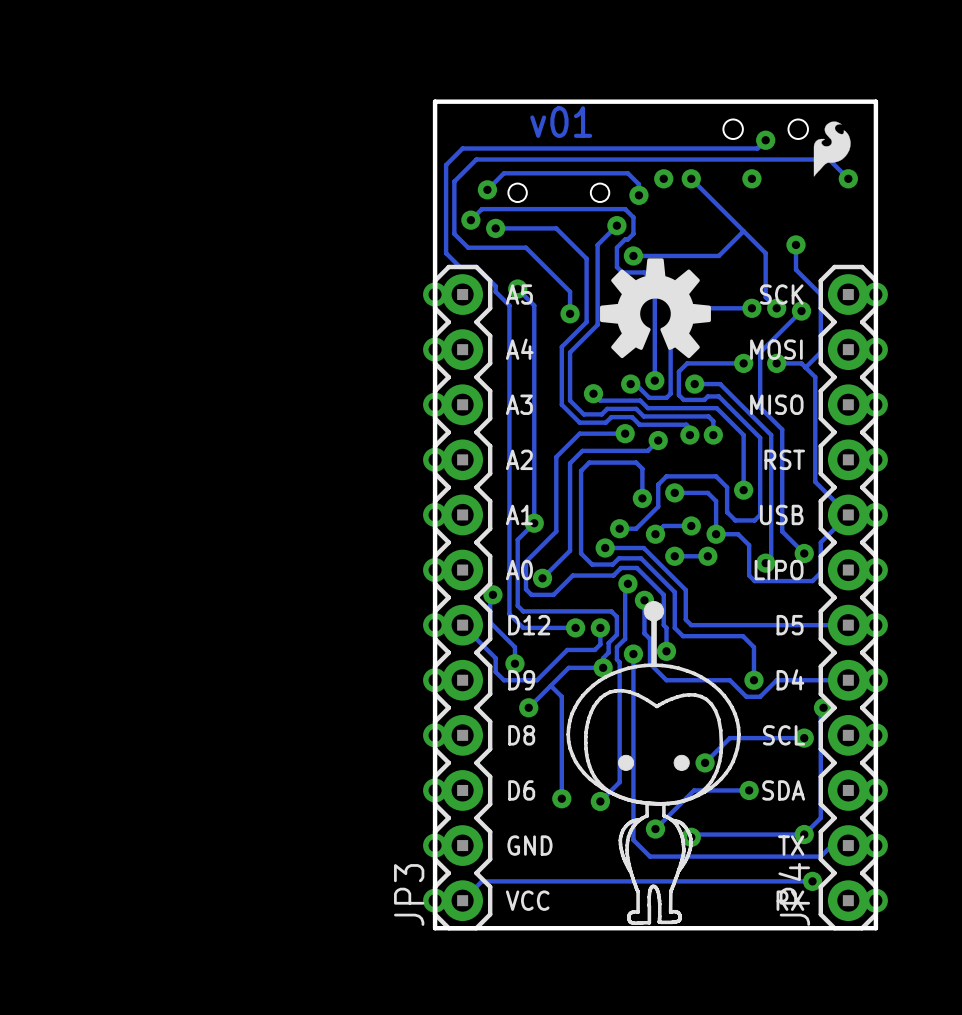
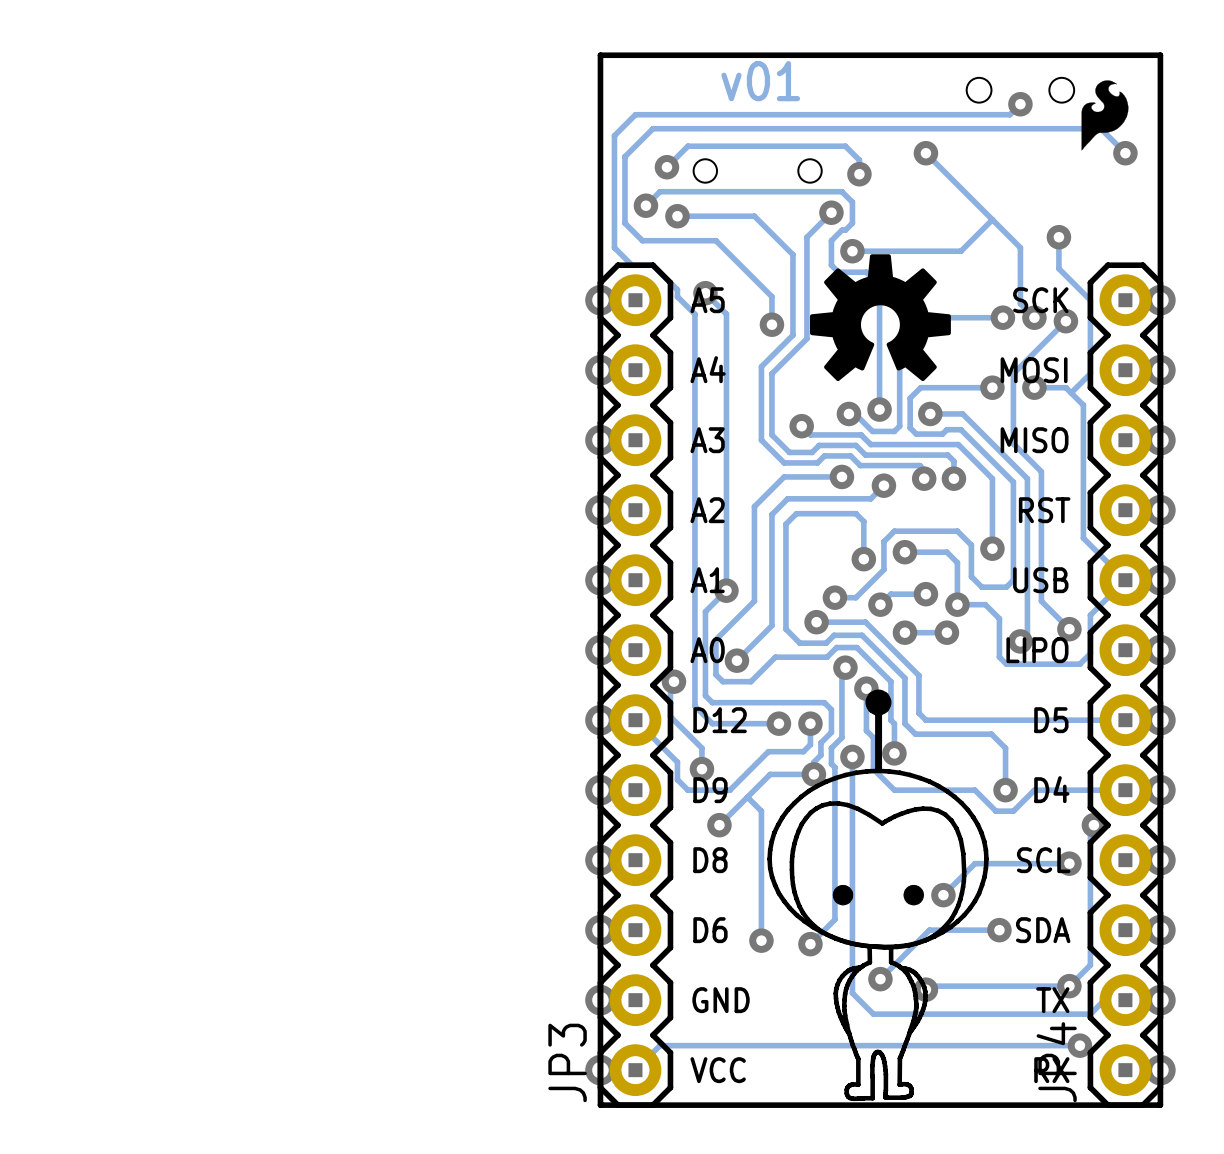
via: (663, 178) -> none
via: (751, 178) -> none

